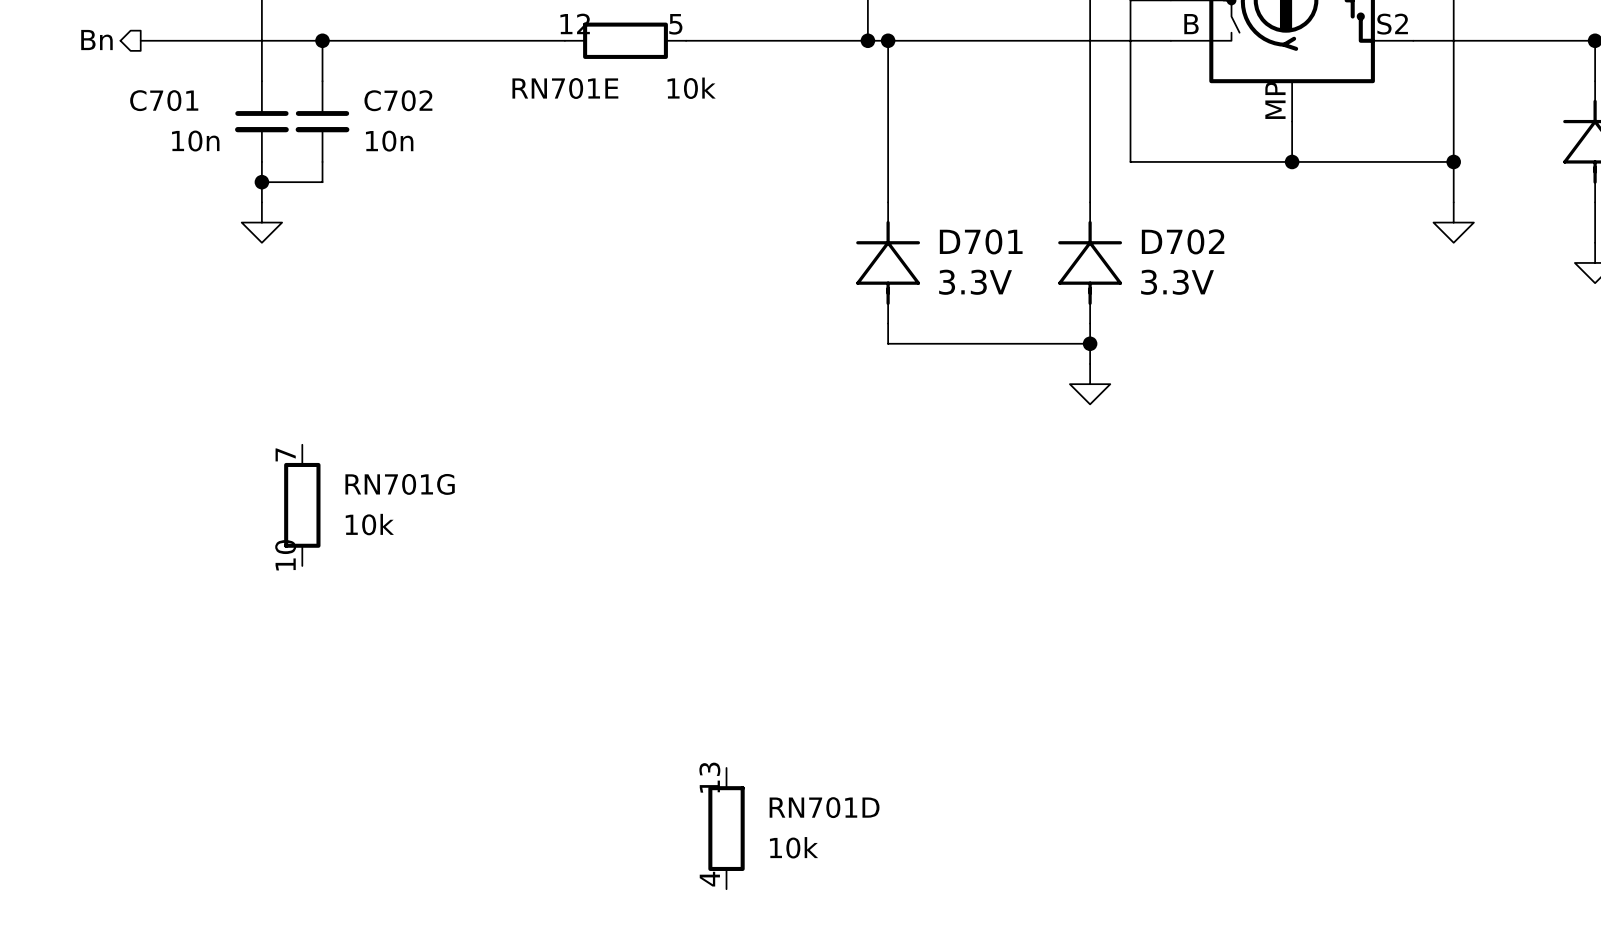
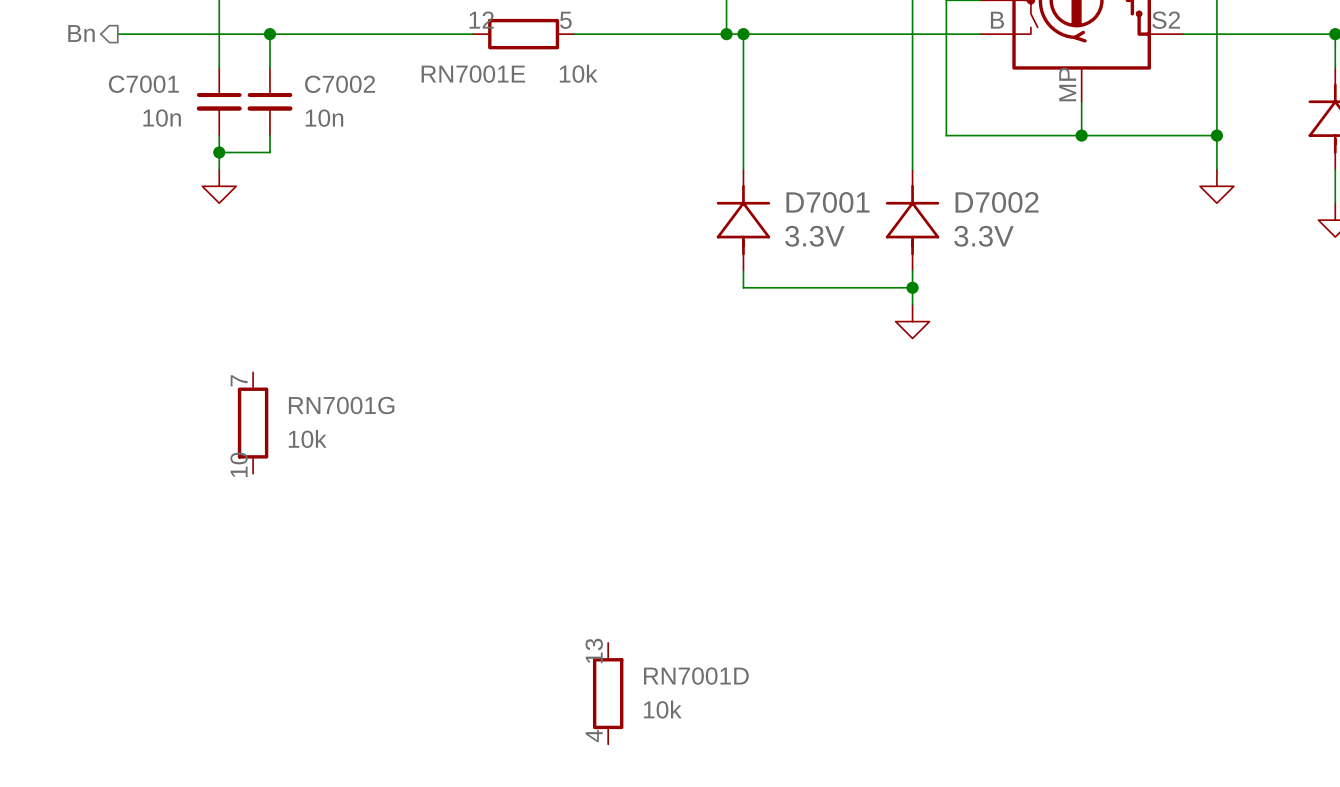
RN701E name: RN701E (565, 88) -> RN7001E (473, 74)
C701 name: C701 (164, 100) -> C7001 (143, 84)
C702 name: C702 (398, 100) -> C7002 (340, 84)
D701 name: D701 (981, 241) -> D7001 (827, 202)
D702 name: D702 (1183, 241) -> D7002 (997, 202)
RN701G name: RN701G (400, 484) -> RN7001G (341, 405)
RN701D name: RN701D (824, 807) -> RN7001D (696, 676)

